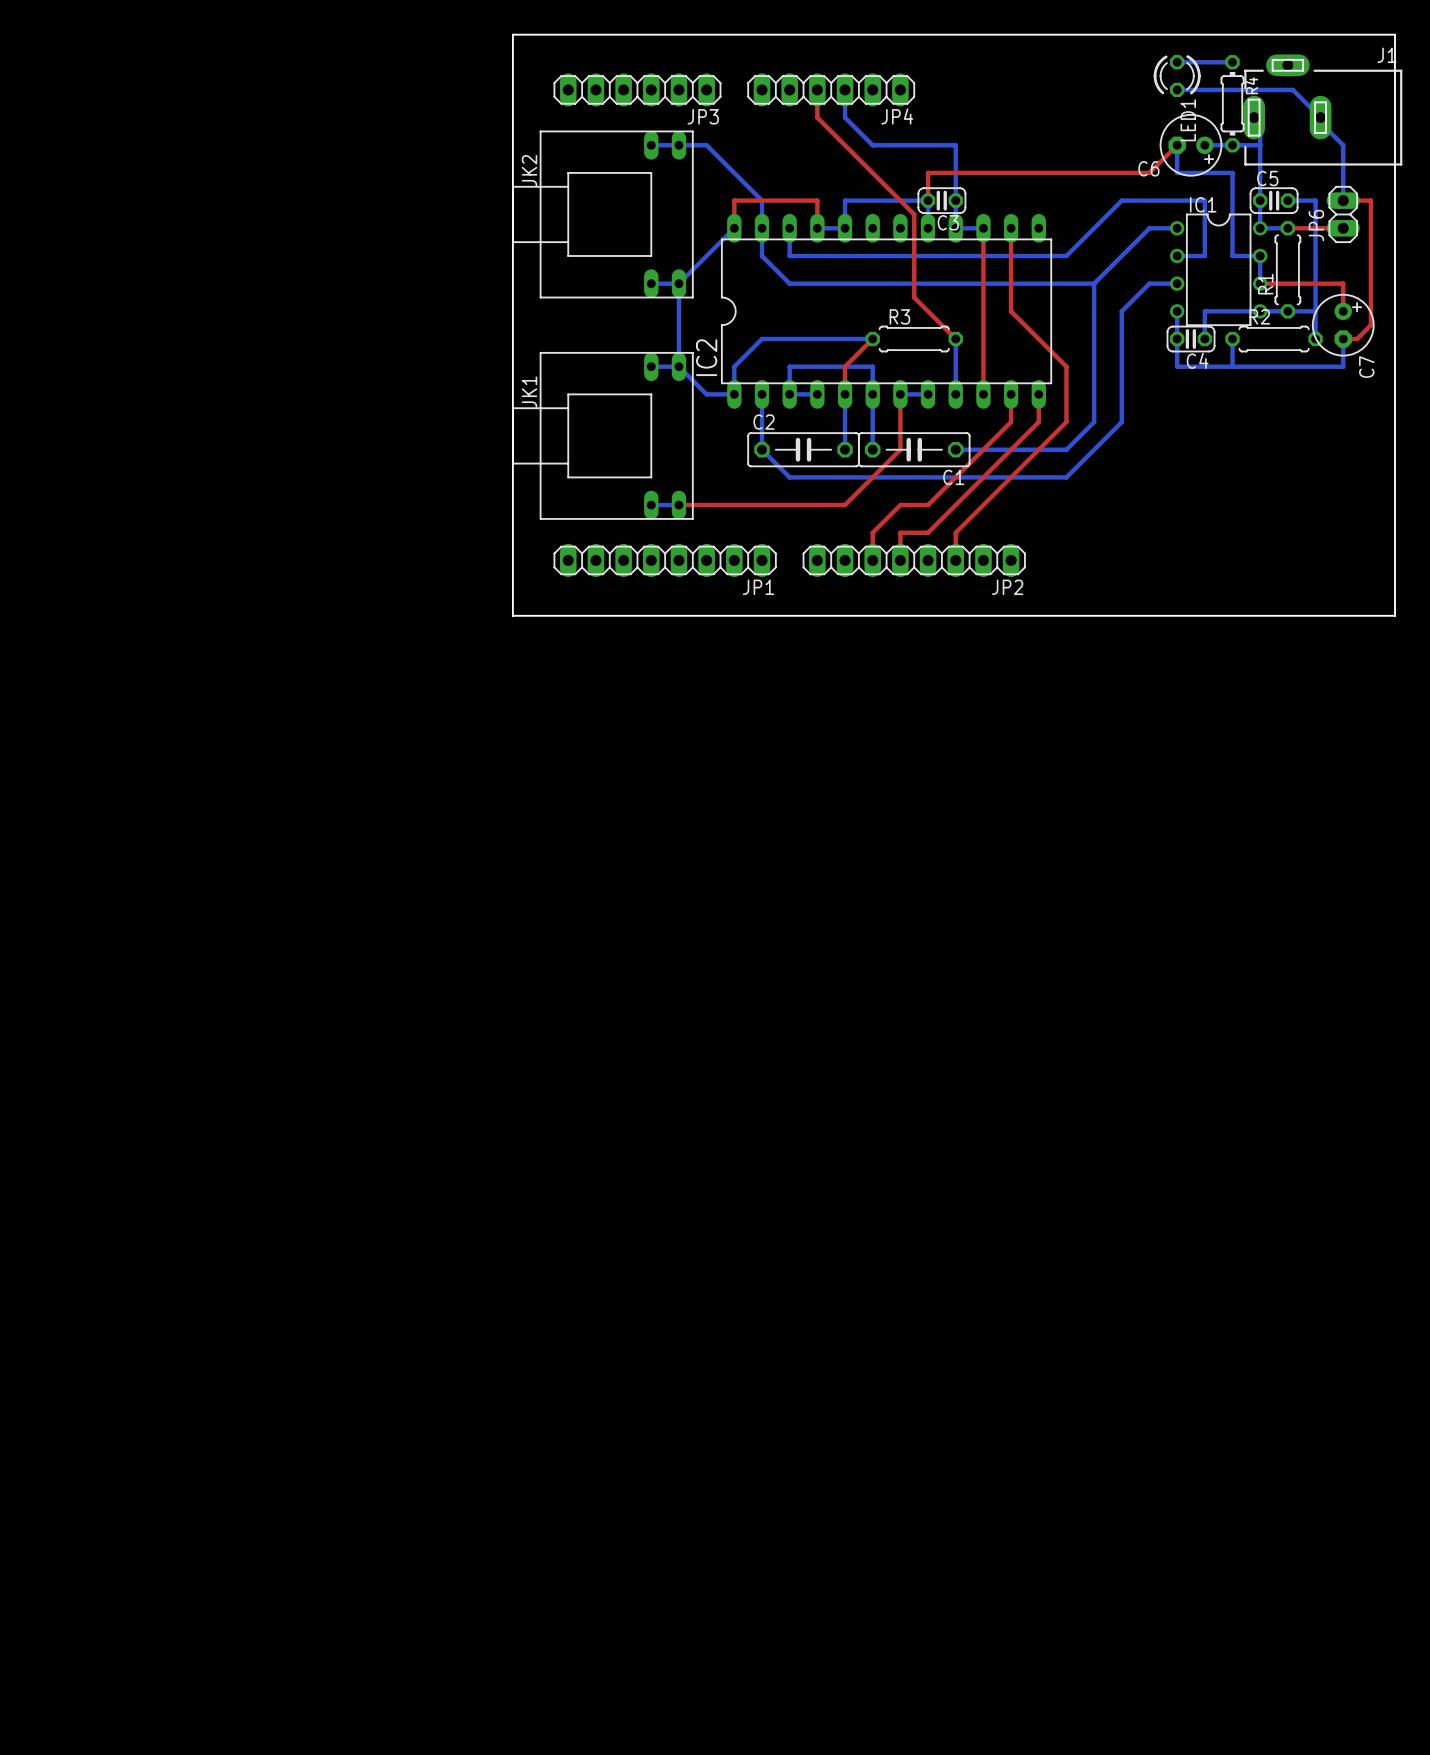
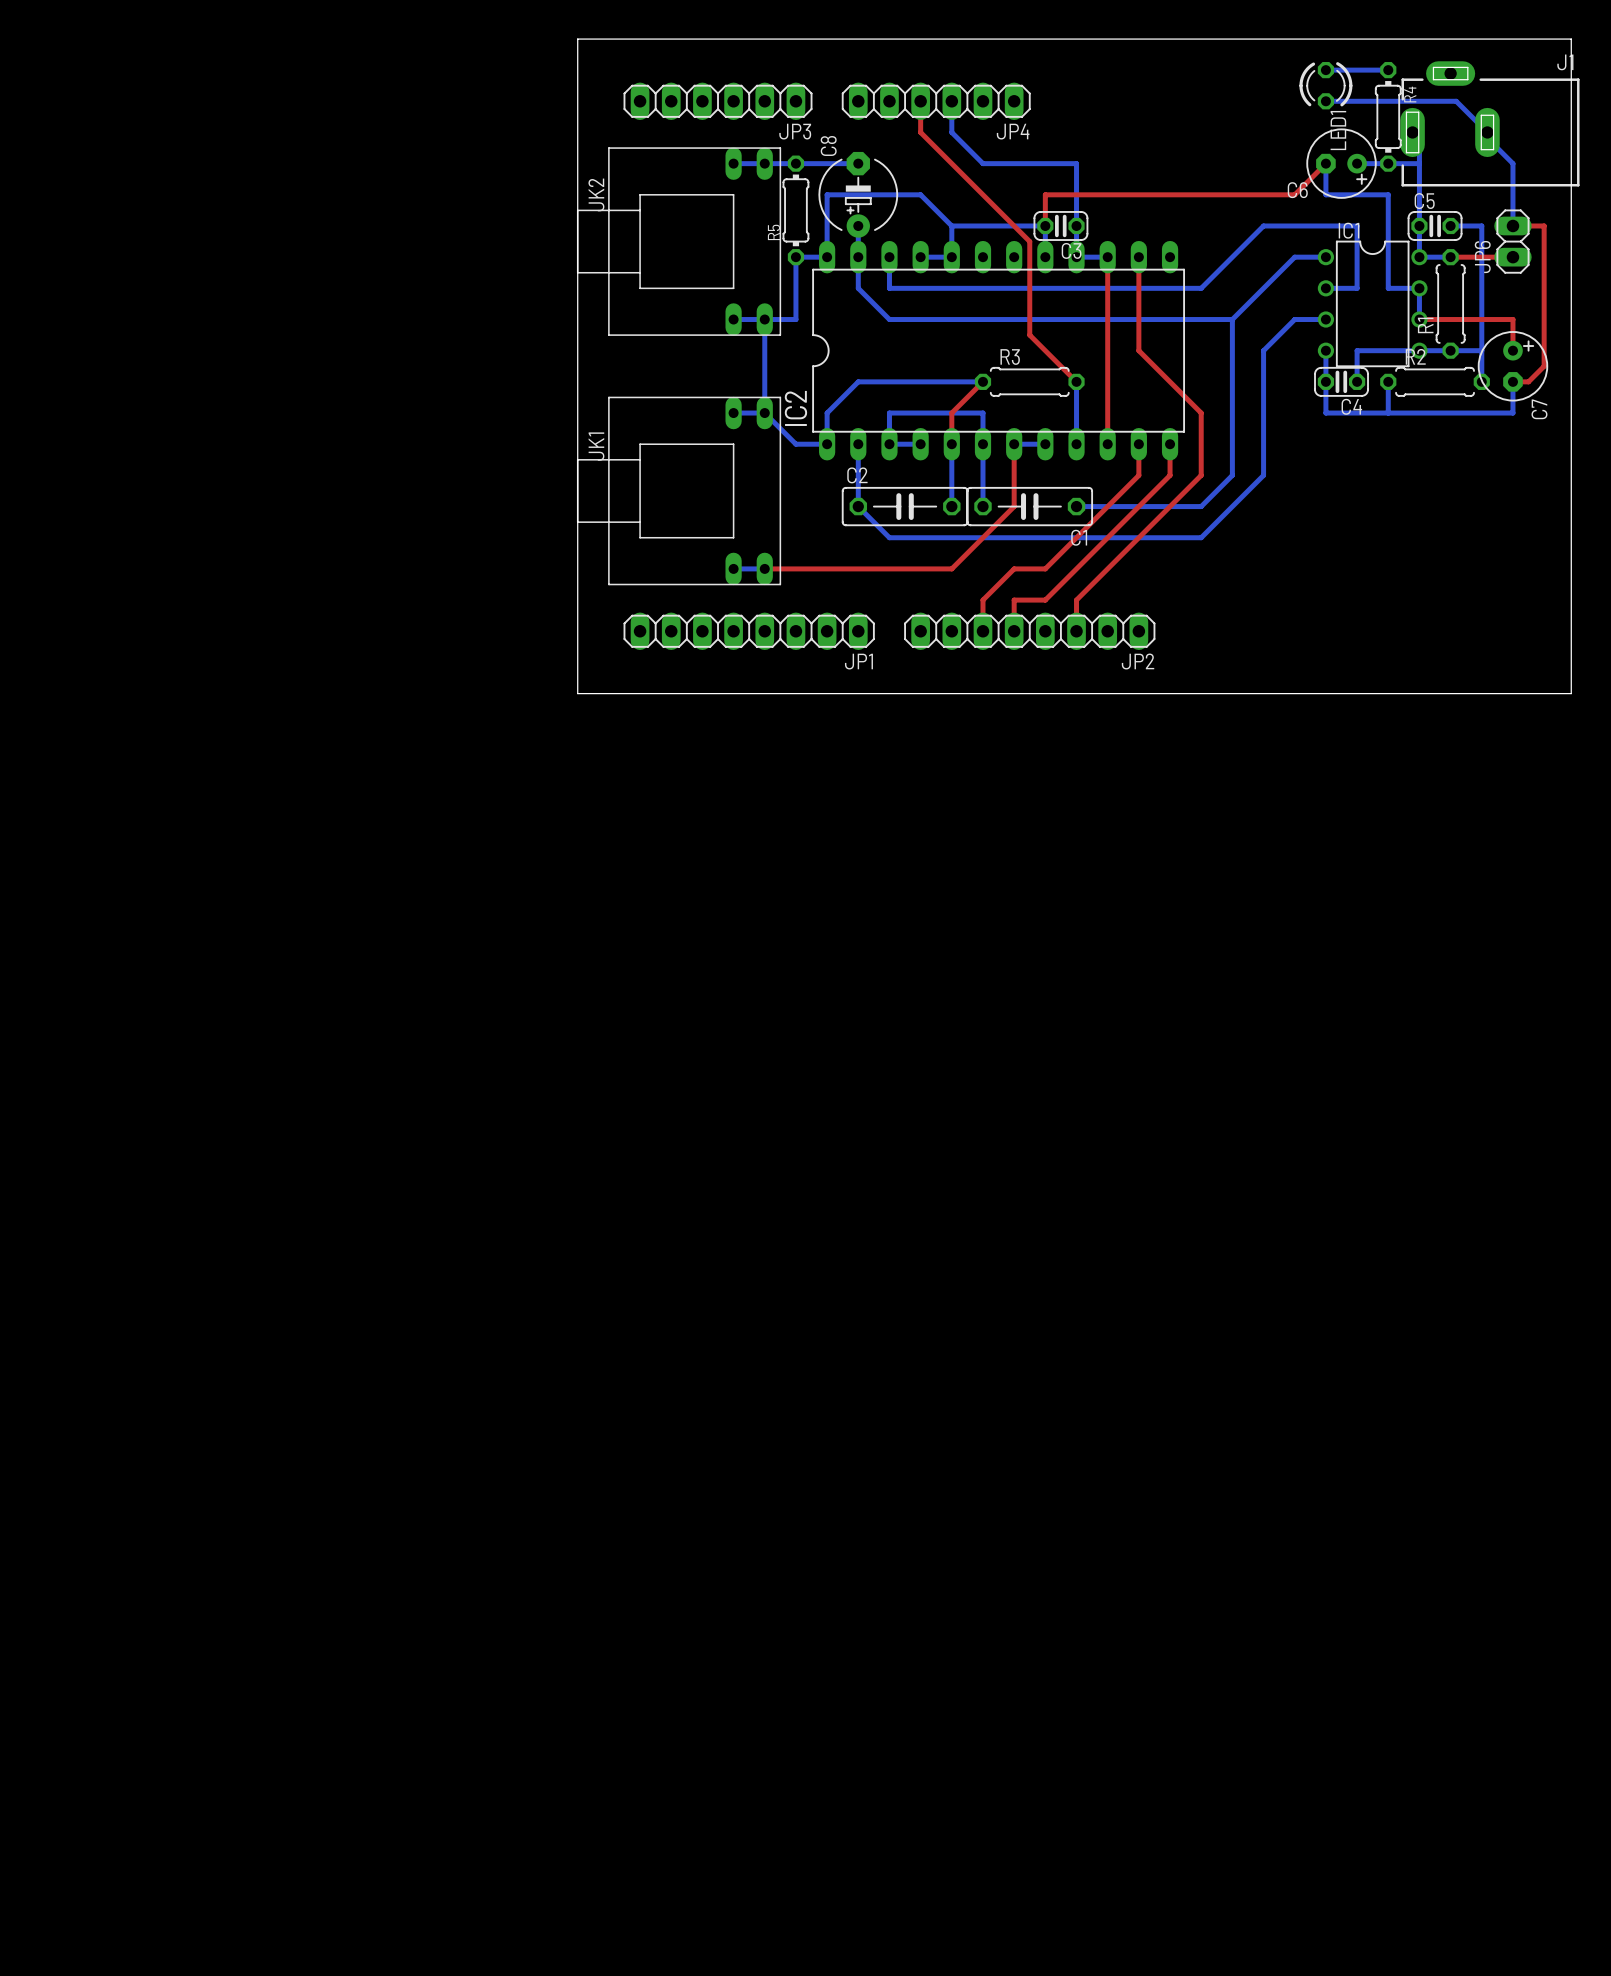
bottom track: (706, 145) (762, 200) -> (795, 163) (858, 163)
C8: none -> (858, 194)
R5: none -> (795, 210)
top track: (734, 228) (734, 200) (817, 200) (817, 228) -> none
bottom track: (734, 228) (678, 283) -> (951, 225) (920, 194) (827, 194) (827, 257) (795, 257) (795, 319) (764, 319)

